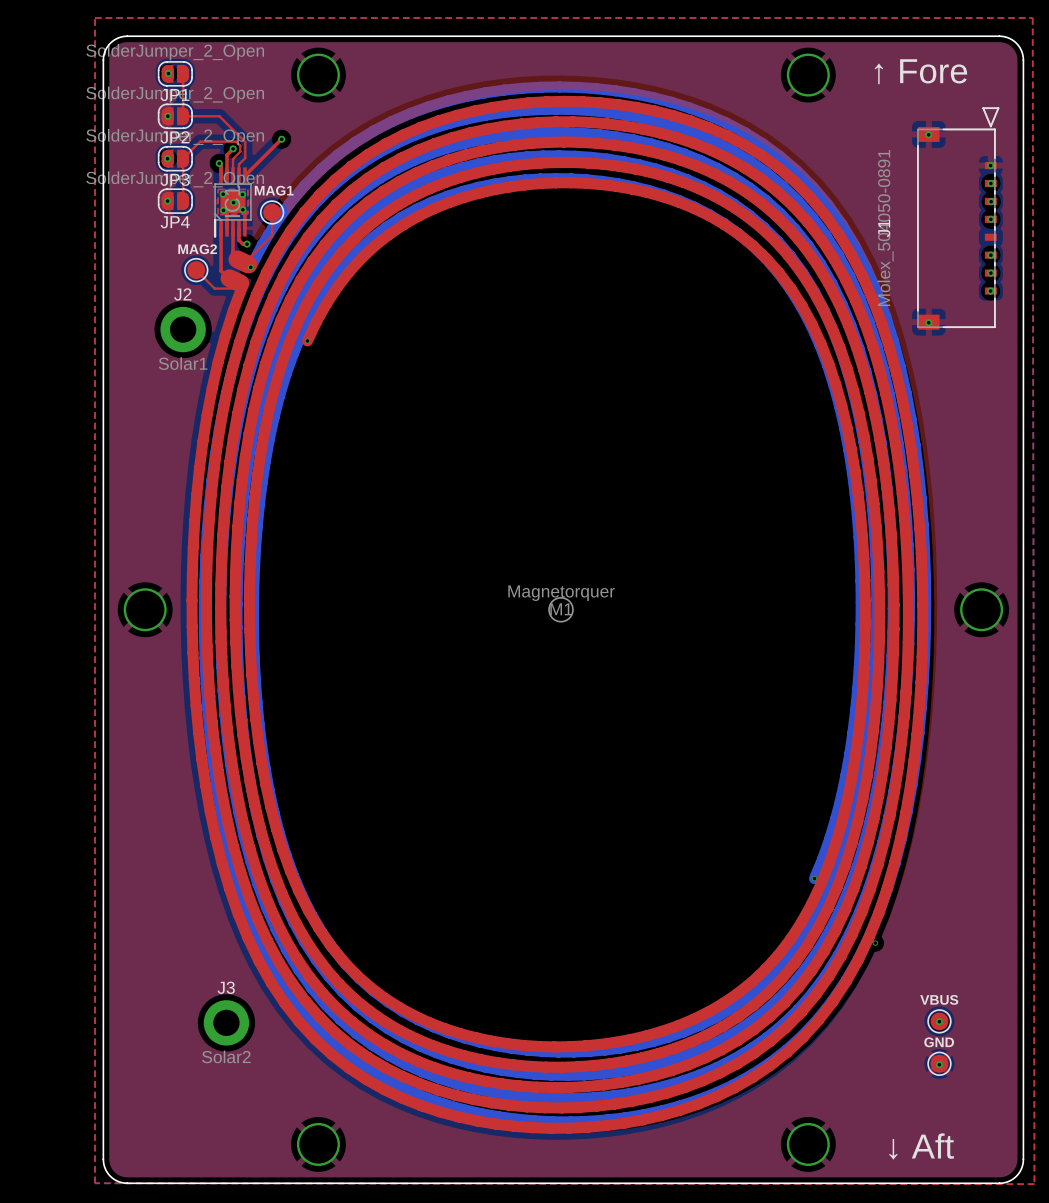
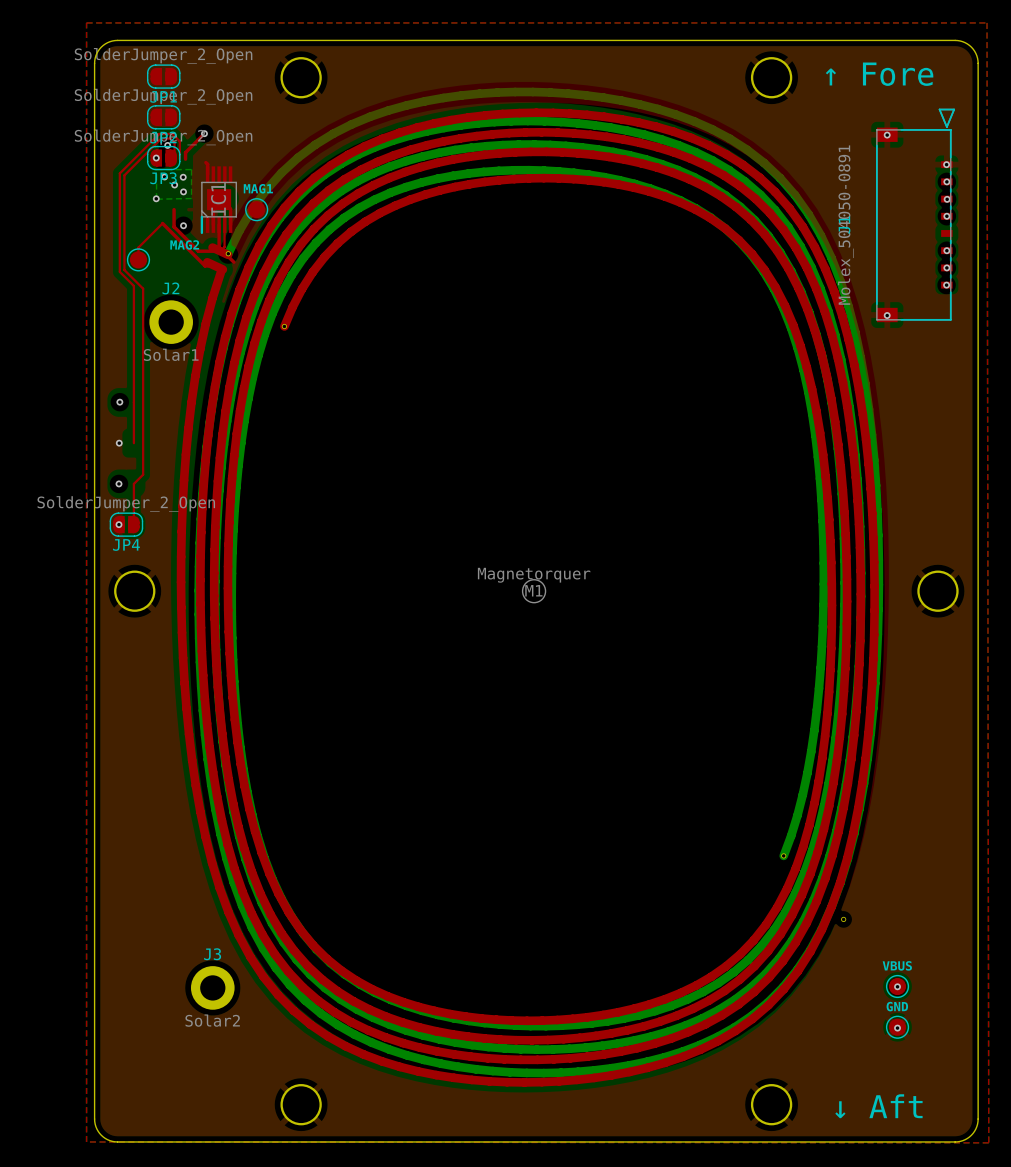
via: (168, 73) -> none
top track: (183, 73) (183, 116) (219, 116) (245, 142) (245, 158) (238, 164) (238, 175) -> none
M1 footprint: [186, 81, 932, 1134] -> [176, 87, 884, 1087]
via: (167, 116) -> none
top track: none -> (204, 133) (185, 152) (185, 159)
via: none -> (204, 133)
top track: (281, 139) (244, 175) -> none
via: (281, 139) -> none
via: none -> (167, 145)
top track: (233, 148) (227, 154) (227, 175) -> none
via: (233, 148) -> none
top track: none -> (174, 159) (174, 142) (170, 138) (161, 138) (124, 175) (124, 270) (143, 288) (143, 474) (133, 483) (133, 524)
top track: none -> (179, 159) (179, 141) (172, 133) (159, 133) (119, 173) (119, 271) (133, 285) (133, 443)
via: (219, 163) -> none
bottom zone outline: none -> (156, 169) (156, 199) (191, 198) (191, 169) (156, 169)
top track: (233, 175) (233, 159) (240, 151) (240, 145) (236, 141) (200, 141) (183, 158) (183, 201) -> none
via: none -> (164, 176)
via: none -> (183, 177)
via: none -> (174, 185)
top zone outline: (218, 189) (218, 214) (247, 213) (247, 189) (218, 189) -> none
via: none -> (183, 191)
via: (223, 194) -> none
via: (242, 194) -> none
top track: none -> (224, 198) (224, 247) (220, 251) (198, 251) (174, 226) (174, 209)
JP4 position: (175, 201) -> (126, 524)
via: (233, 202) -> none
via: (242, 209) -> none
via: (223, 210) -> none
top track: (272, 212) (272, 235) (243, 262) -> none
top track: (221, 228) (221, 270) (238, 288) (214, 288) (196, 270) -> none
top track: (238, 228) (238, 240) (242, 244) (247, 244) -> none
via: none -> (183, 225)
via: (247, 244) -> none
top track: none -> (138, 259) (138, 247) (162, 223) (205, 265) (215, 265)
part position: (196, 270) -> (138, 259)
via: none -> (119, 402)
via: none -> (119, 443)
via: none -> (118, 483)
via: none -> (118, 524)

